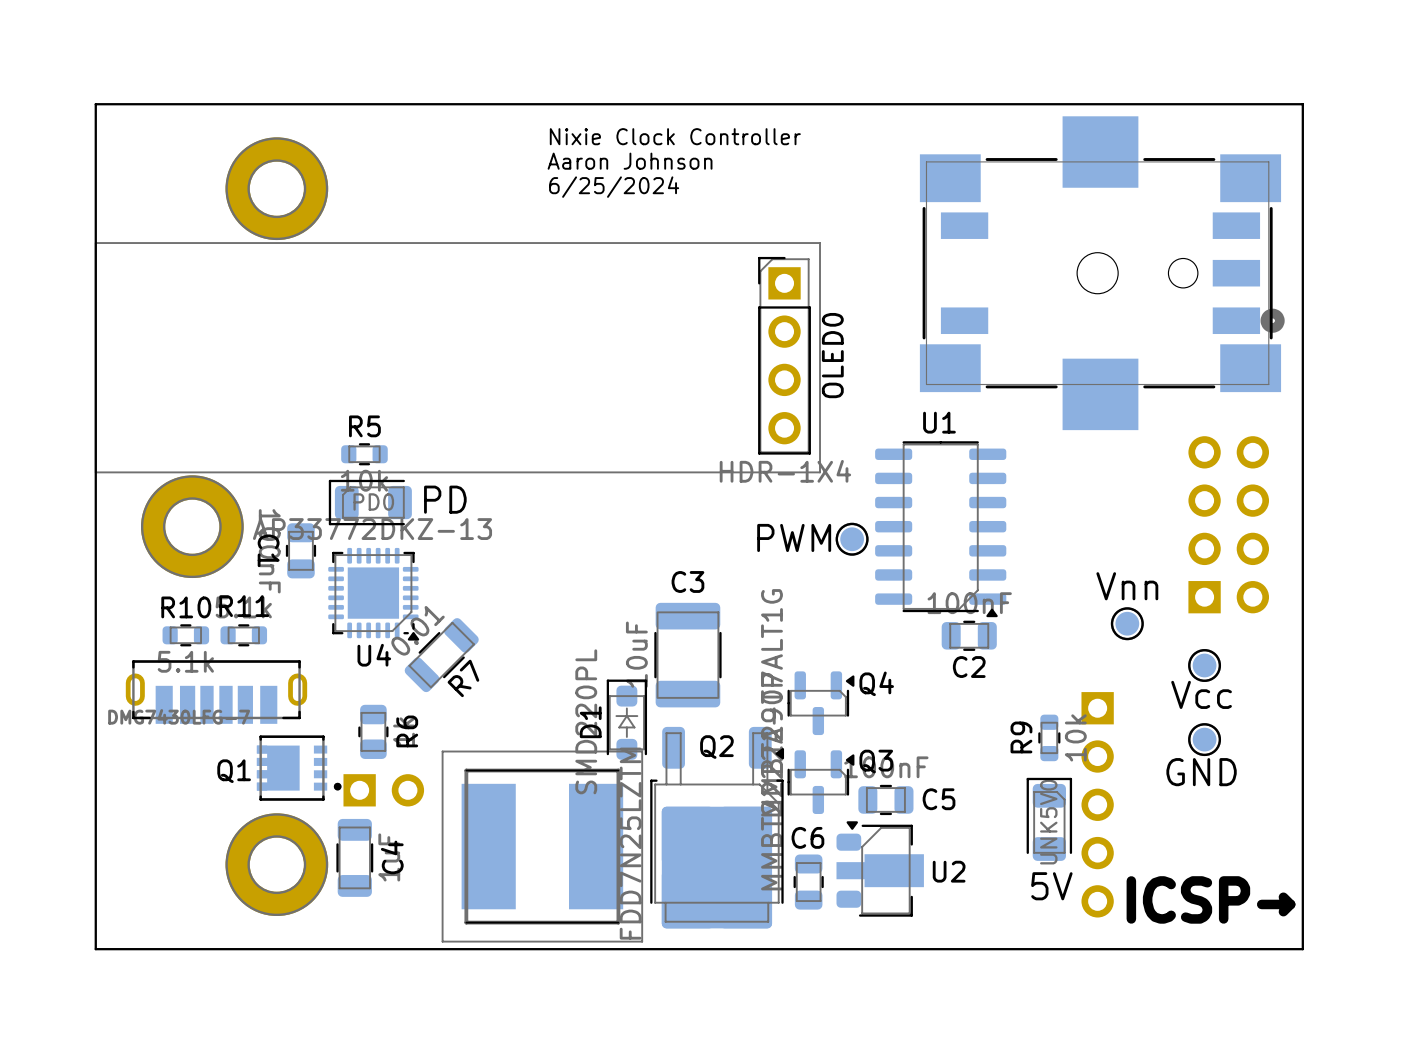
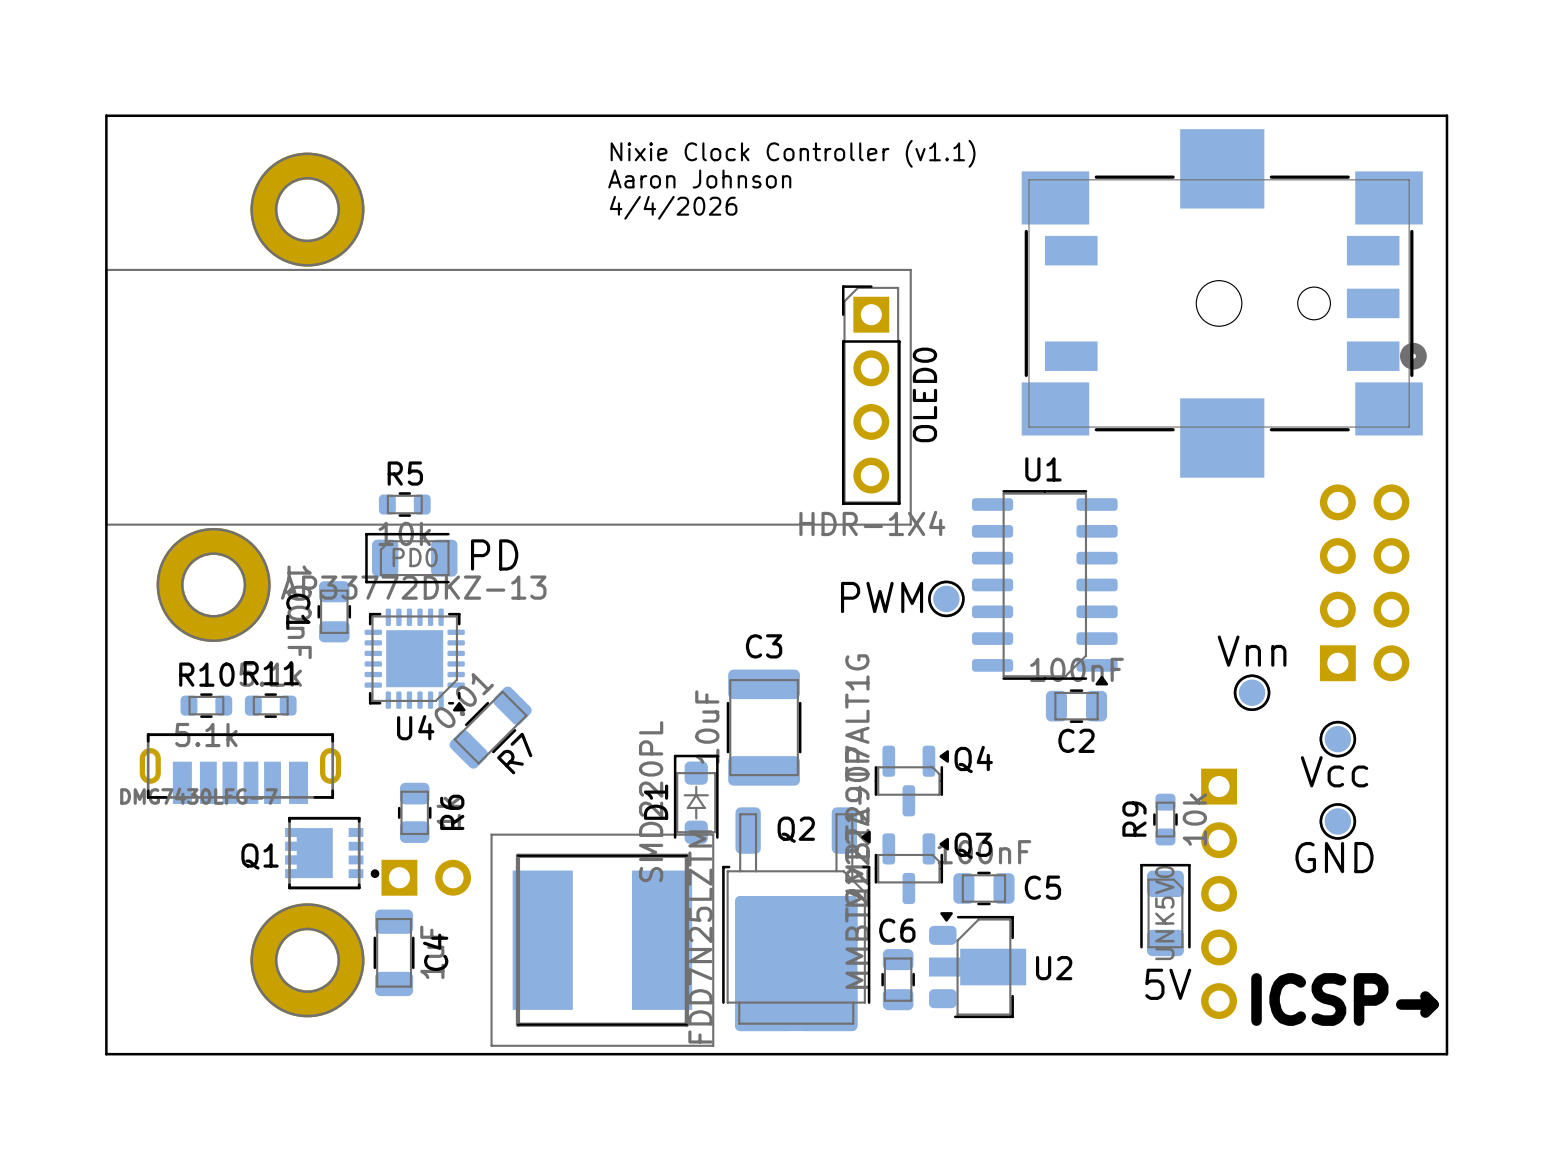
text: Nixie Clock Controller (675, 136) -> Nixie Clock Controller (v1.1) (793, 153)
text: 6/25/2024 (614, 187) -> 4/4/2026 (673, 207)

